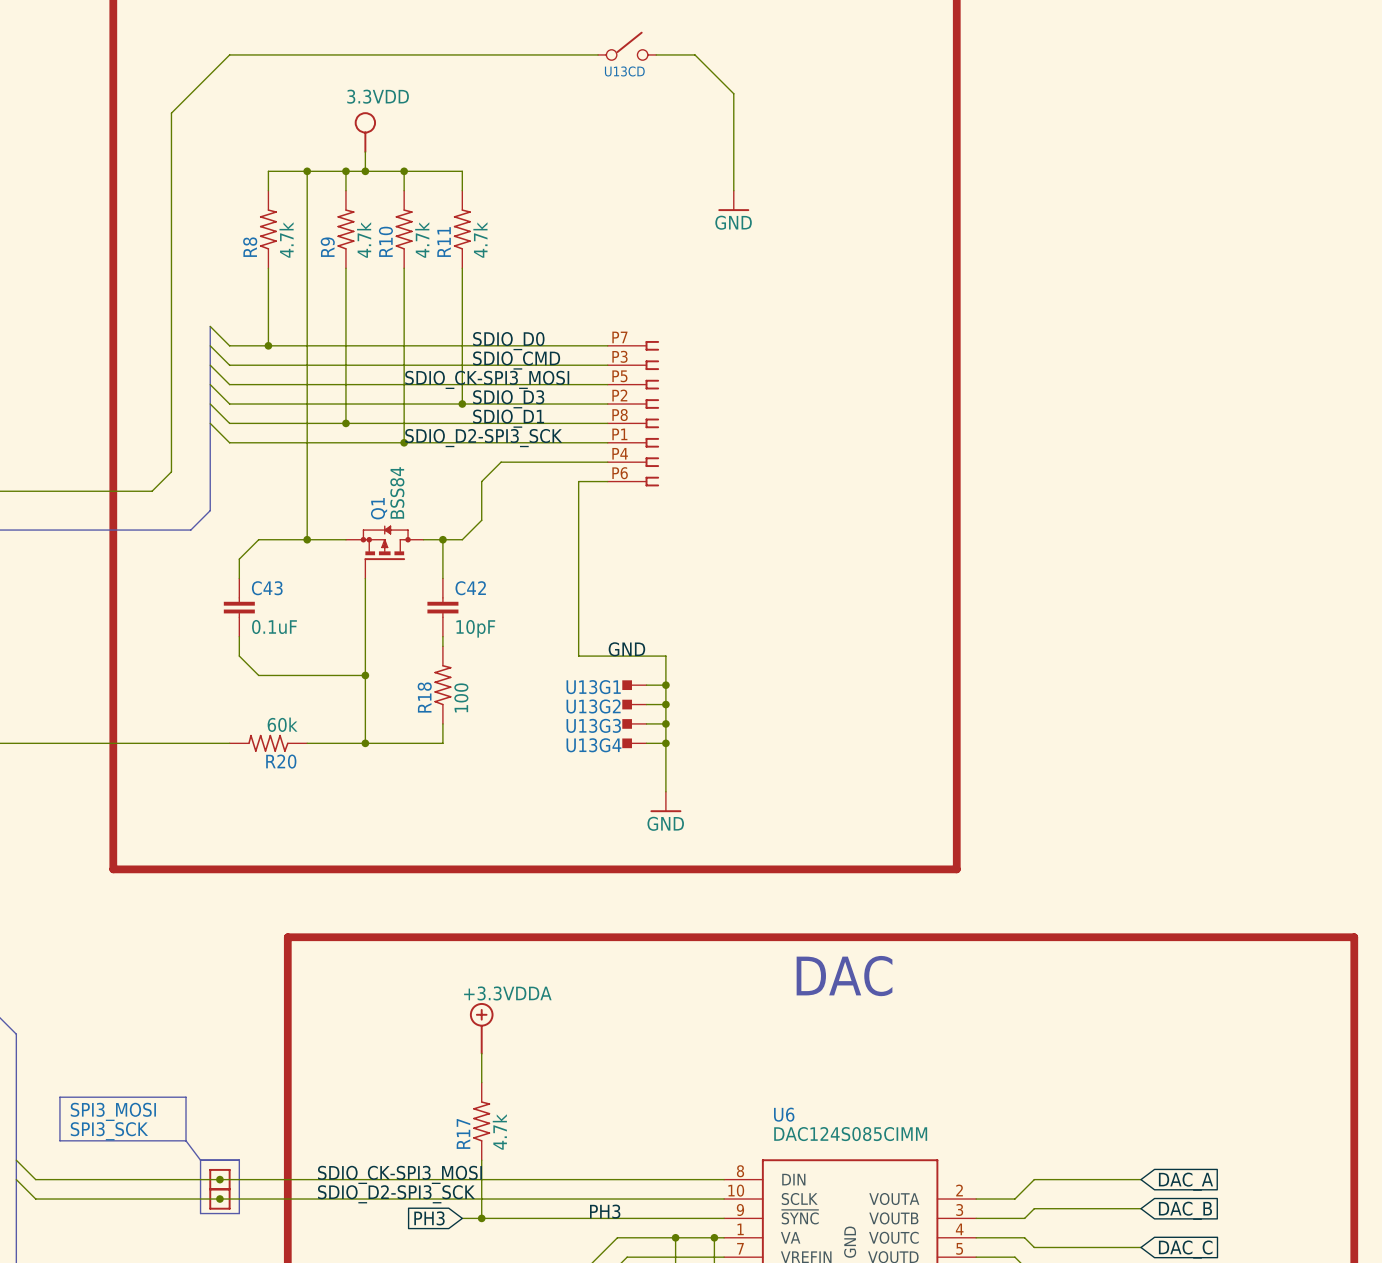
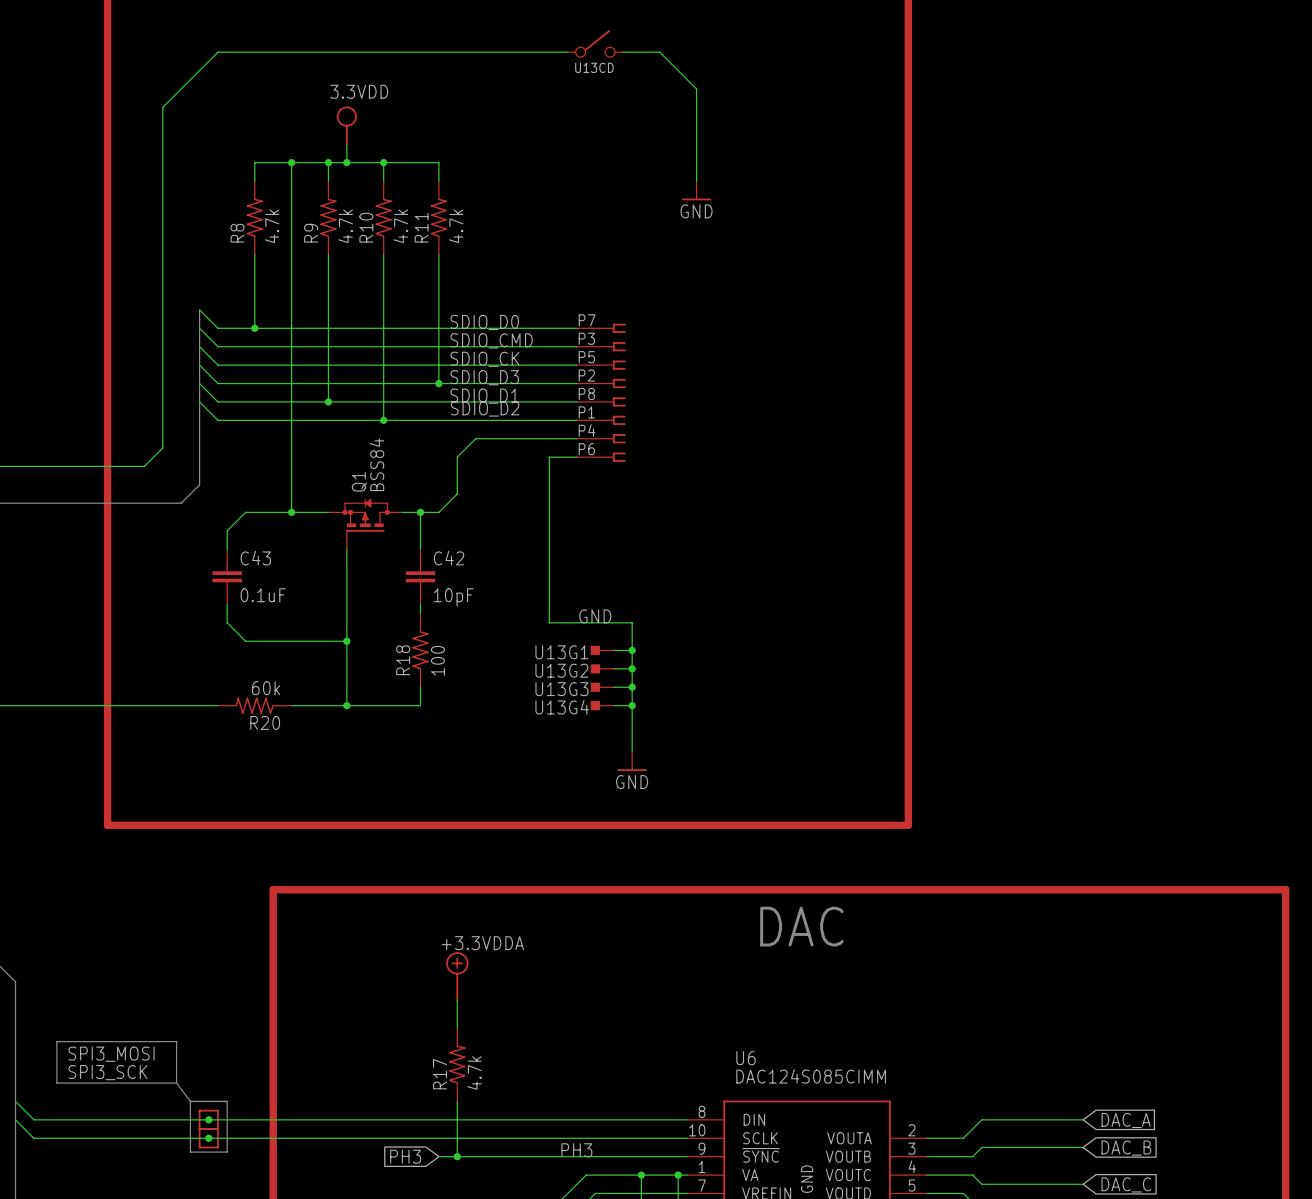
label: SDIO_CK-SPI3_MOSI (487, 379) -> none
label: none -> SDIO_CK (484, 359)
label: SDIO_D2-SPI3_SCK (483, 438) -> SDIO_D2 (485, 409)
label: SDIO_CK-SPI3_MOSI (399, 1174) -> none
label: SDIO_D2-SPI3_SCK (396, 1194) -> none

